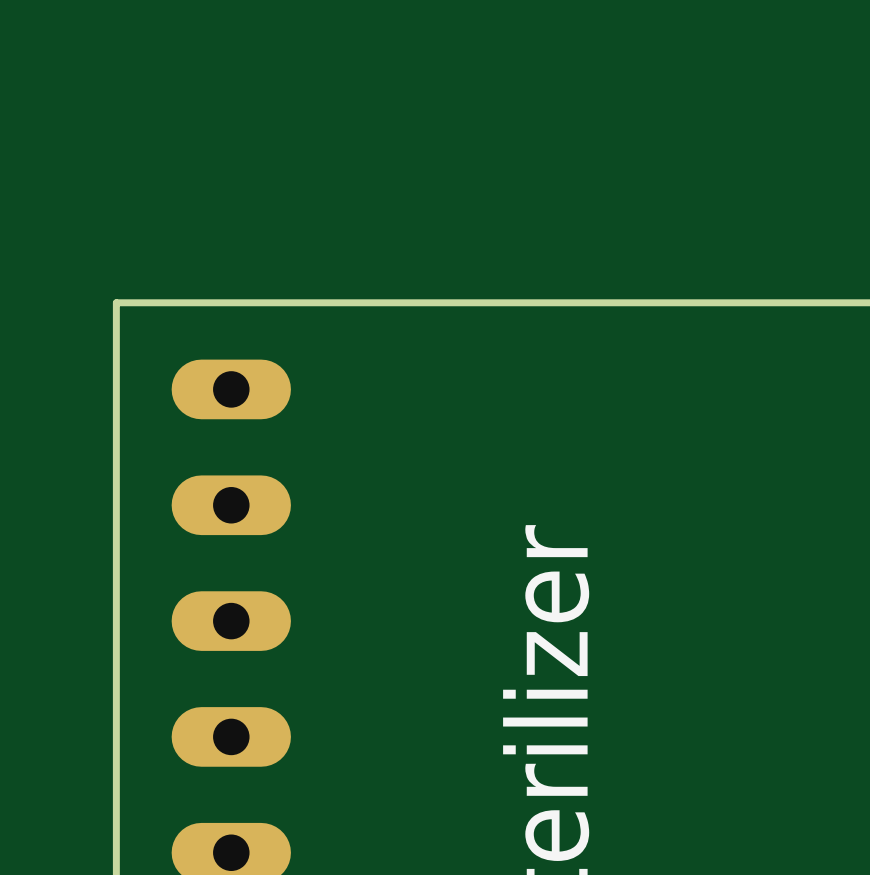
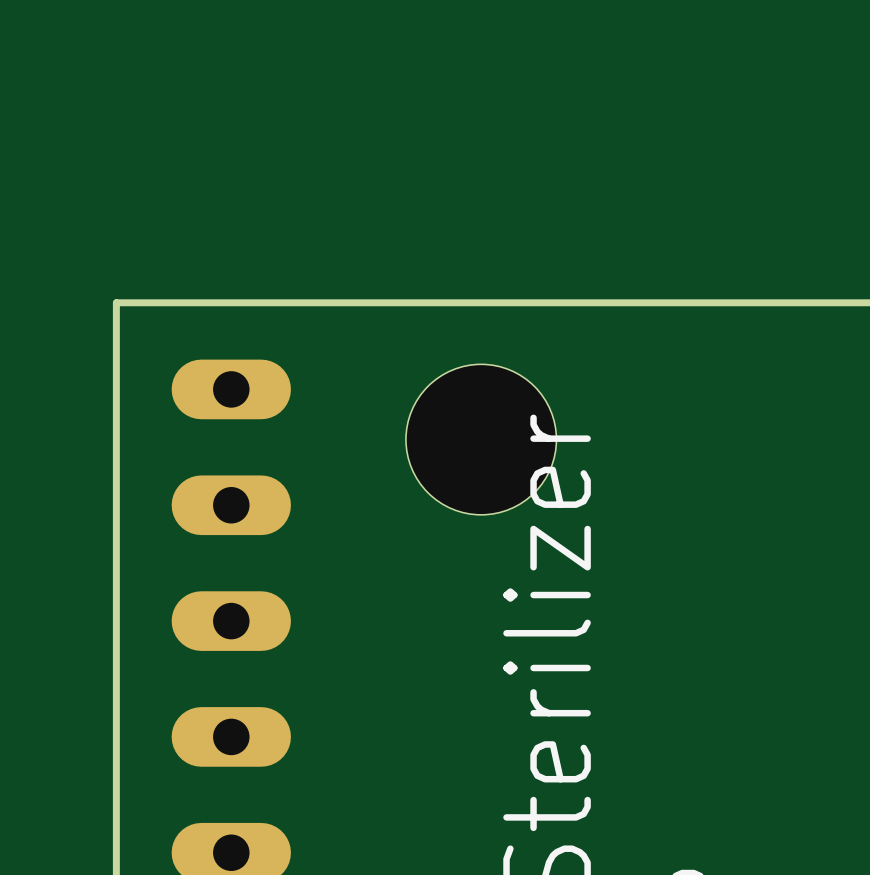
hole: none -> (481, 439)

